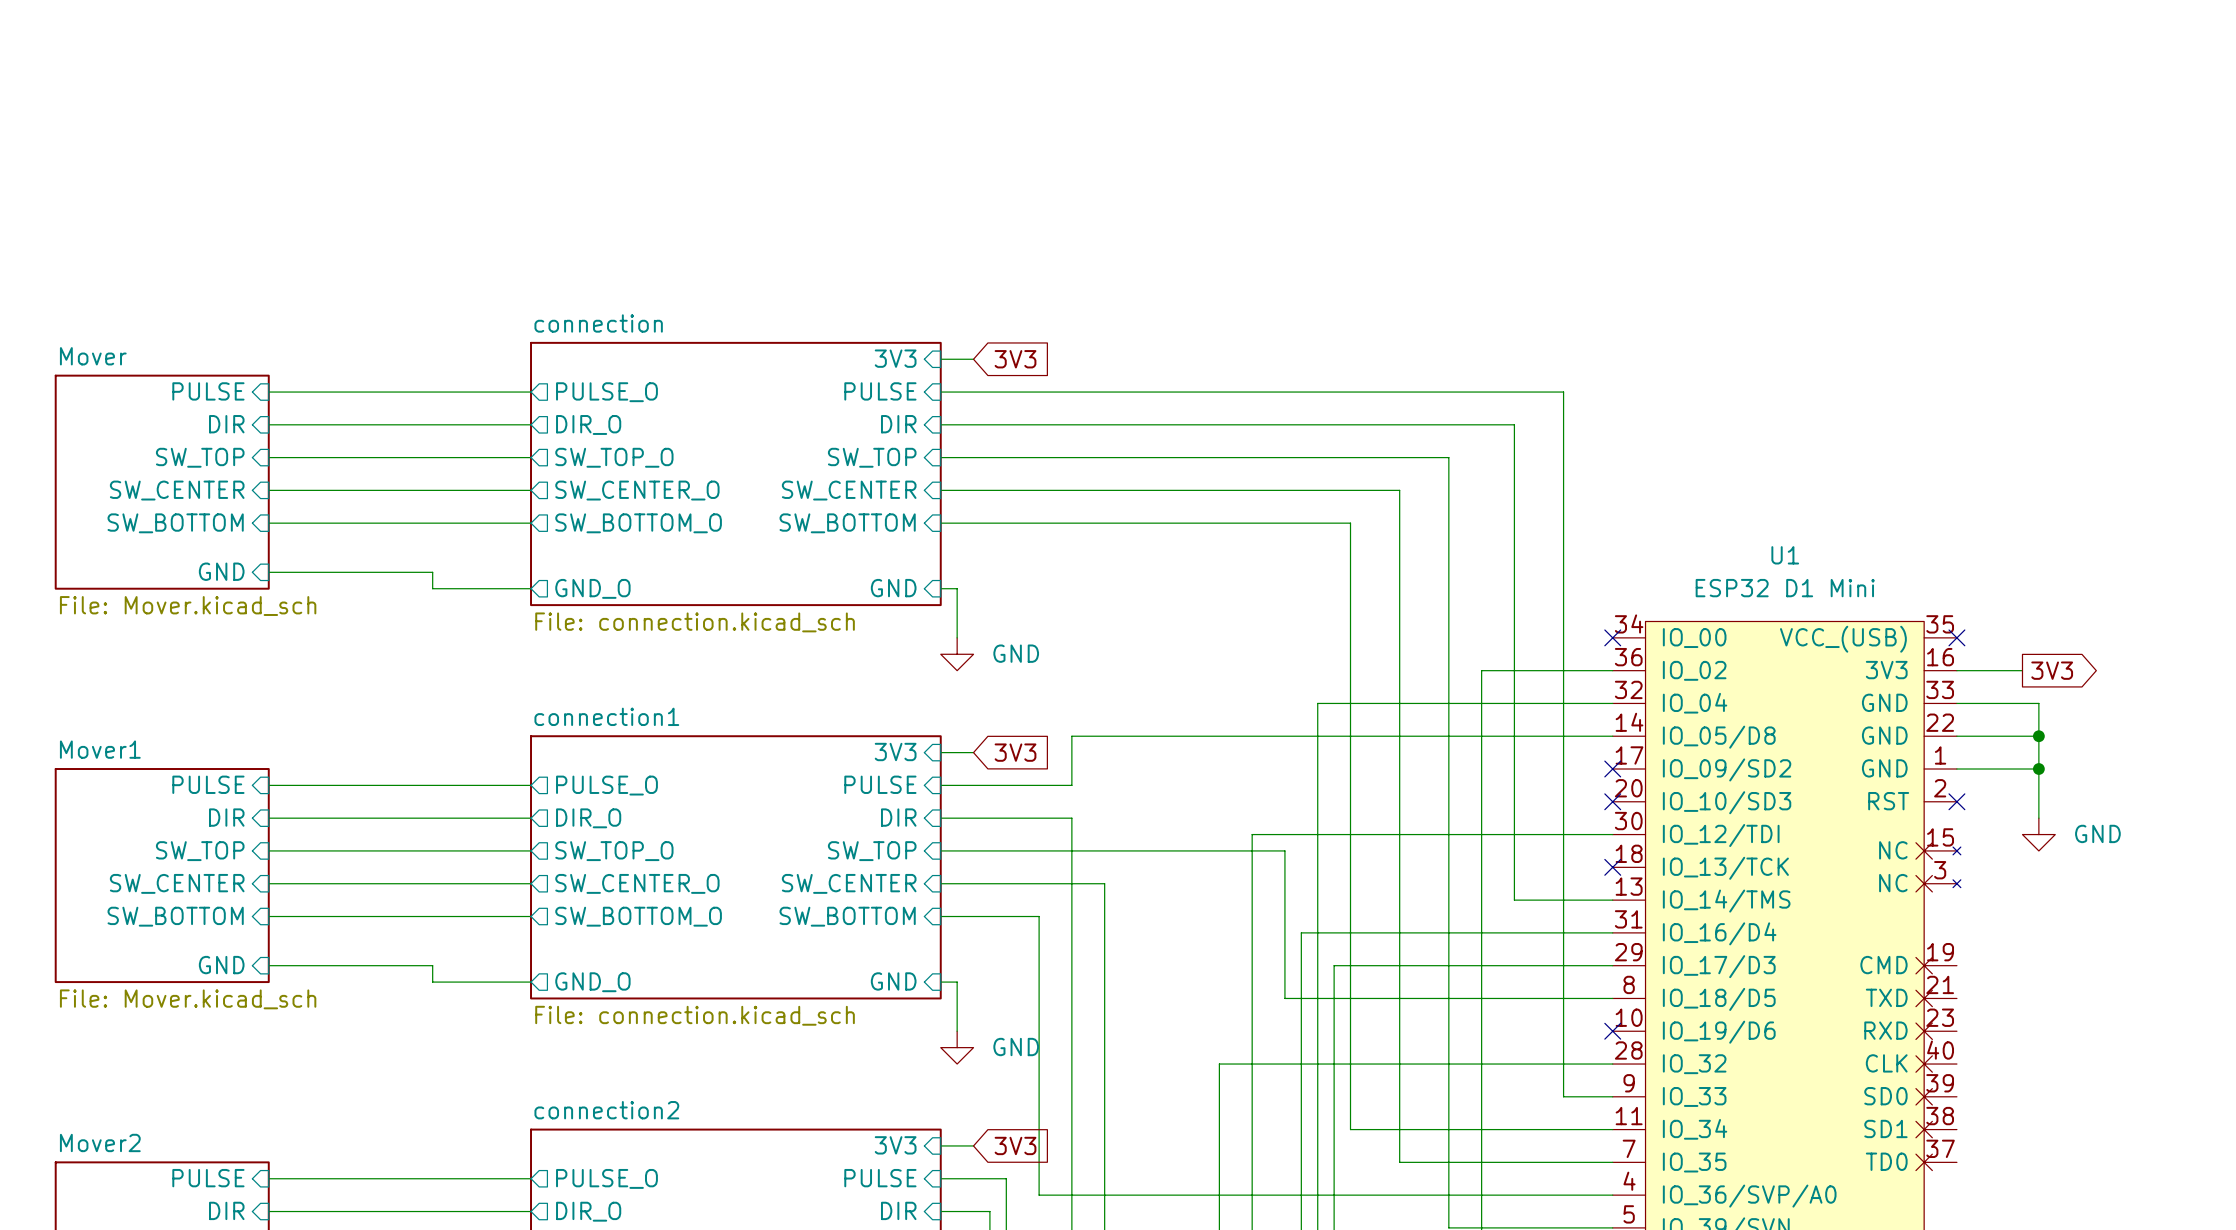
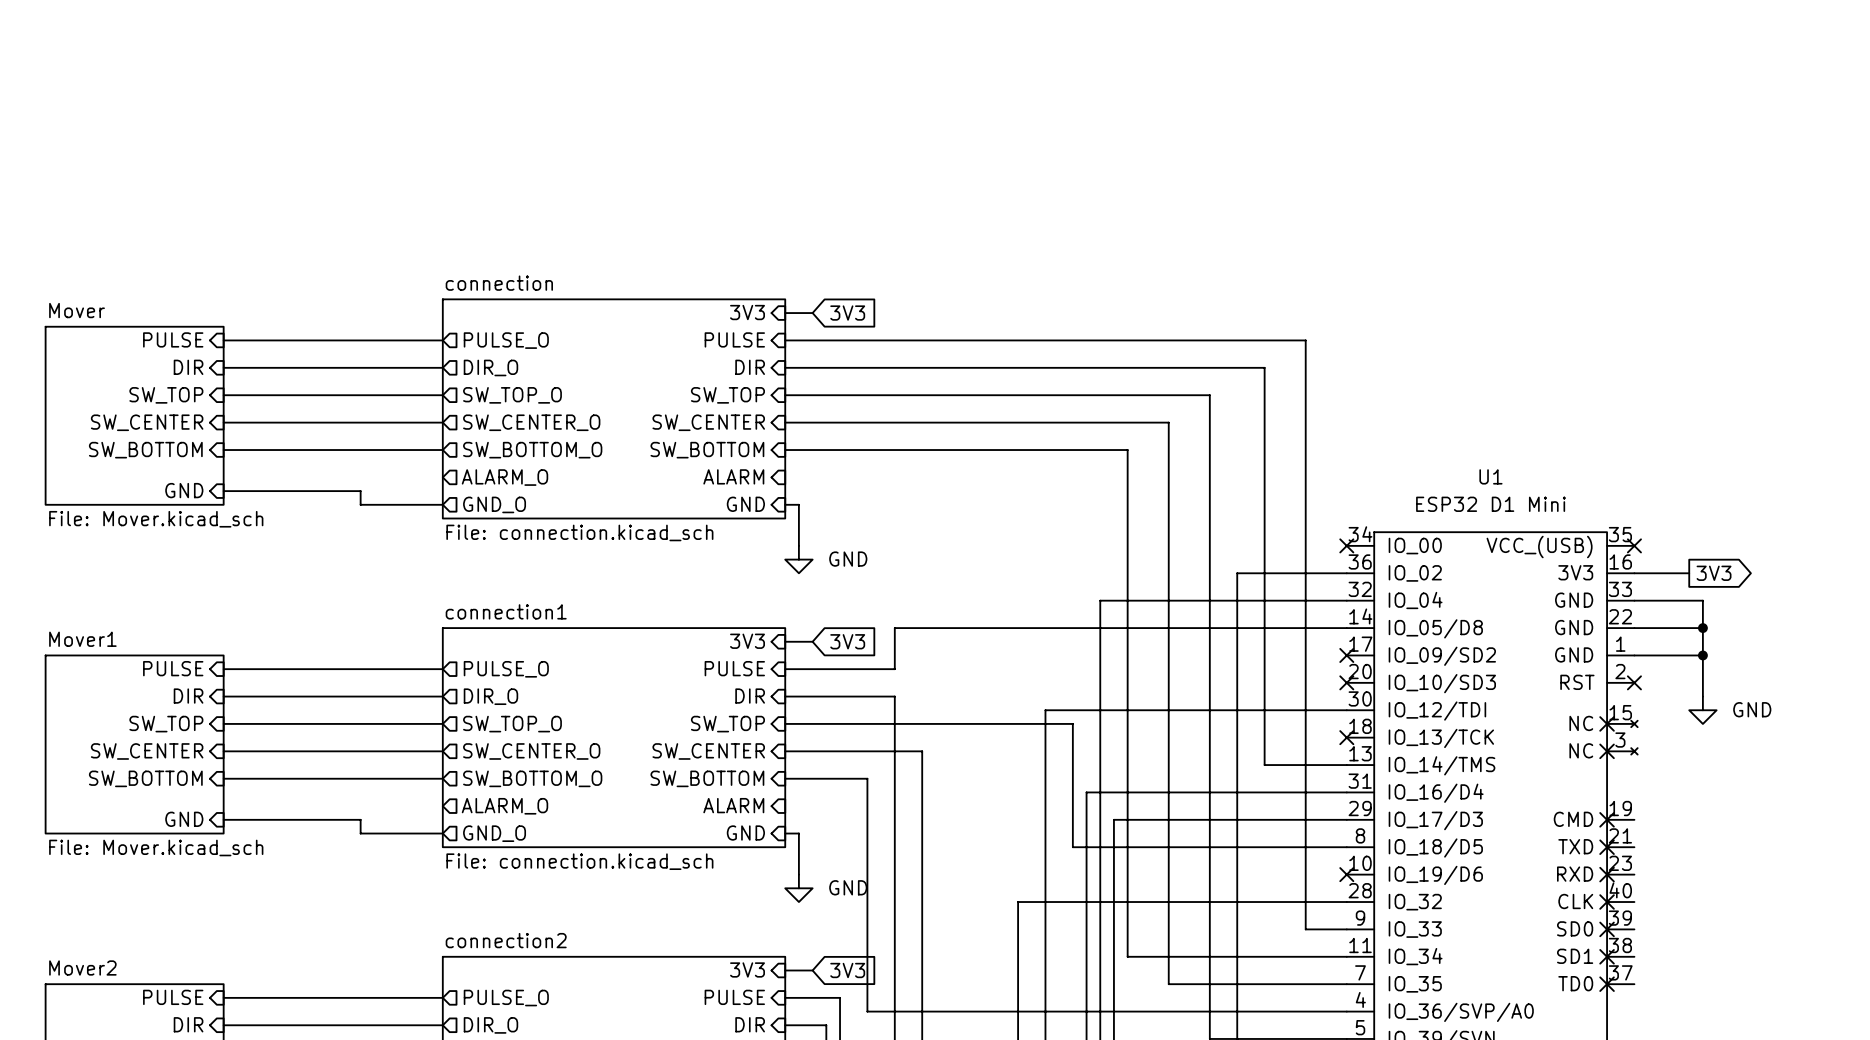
sheet pin: none -> ALARM (733, 476)
sheet pin: none -> ALARM_O (504, 477)
sheet pin: none -> ALARM (733, 805)
sheet pin: none -> ALARM_O (504, 806)

